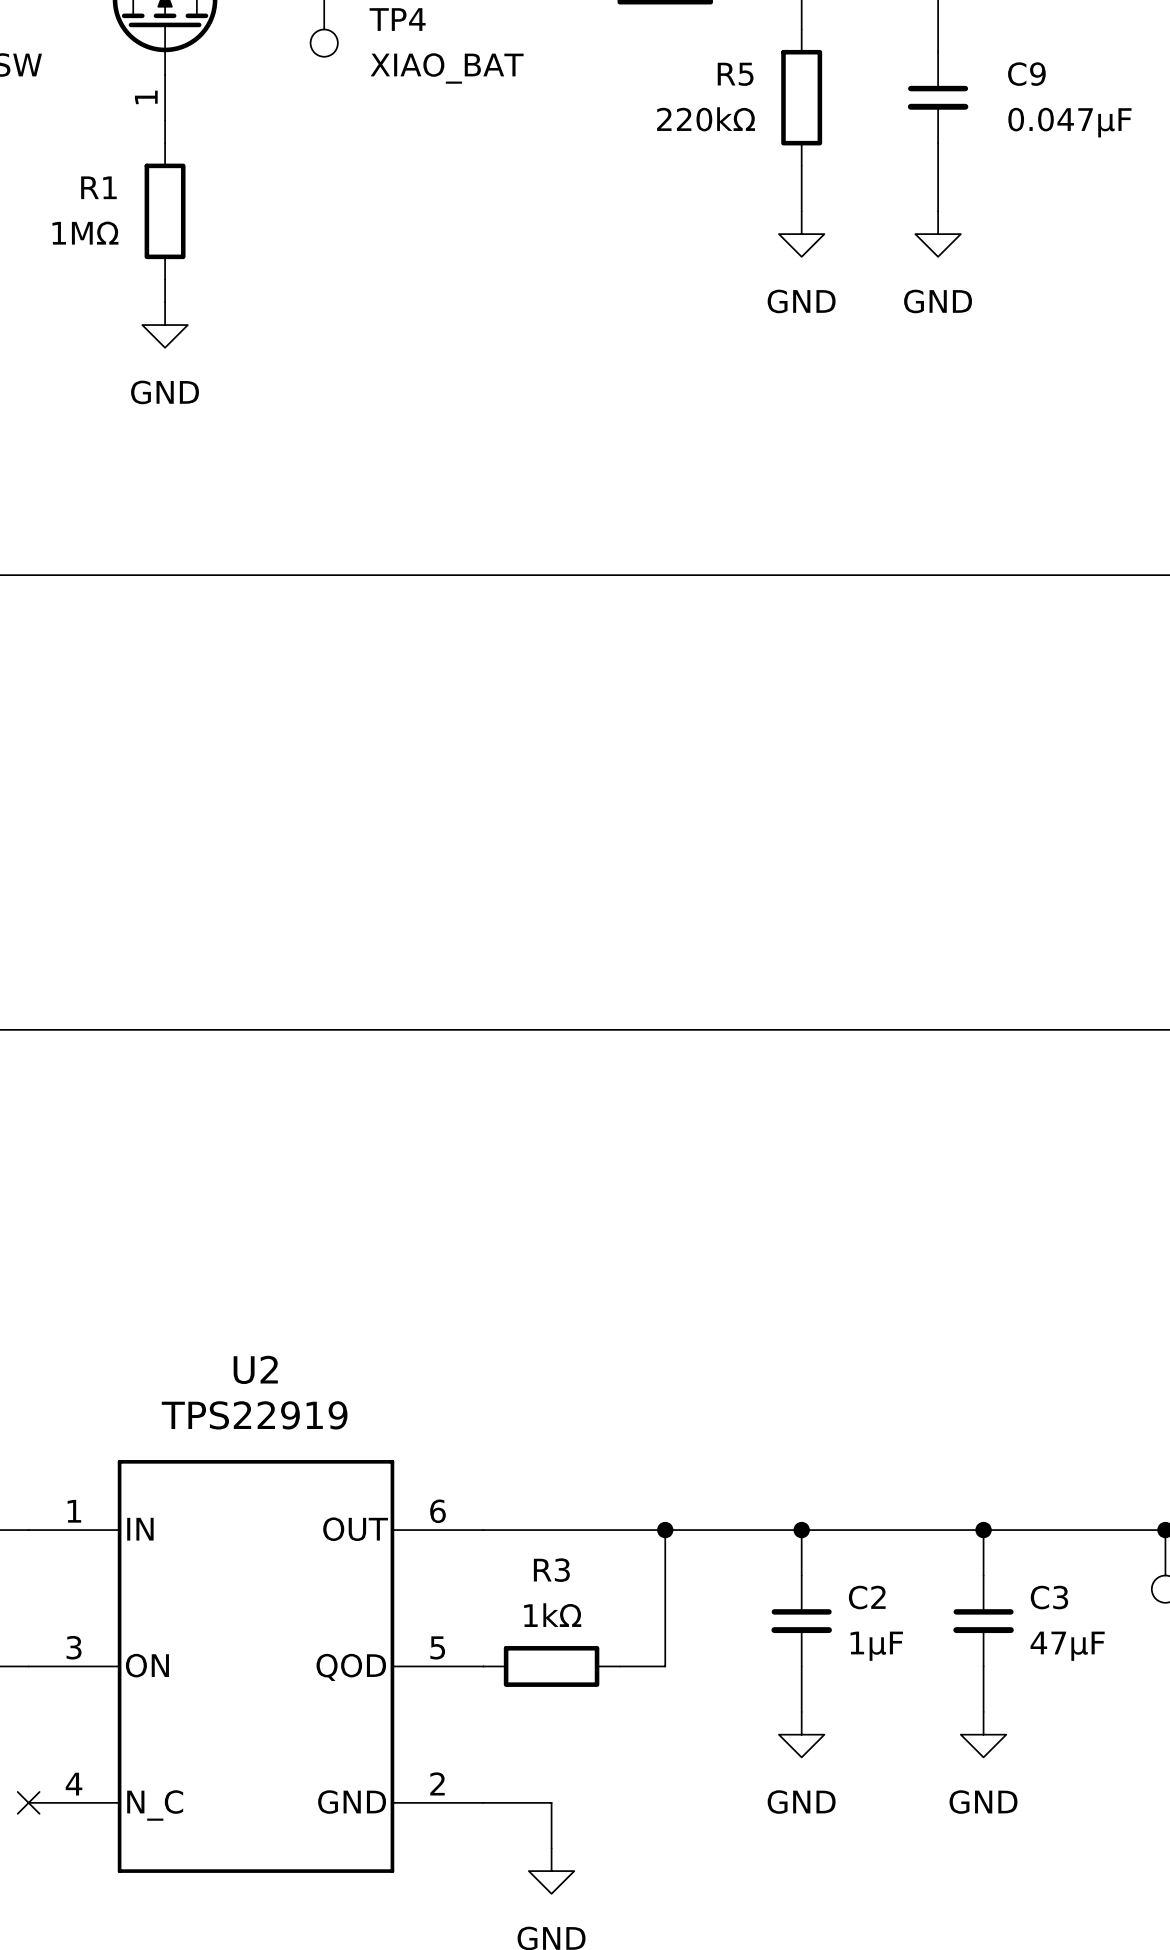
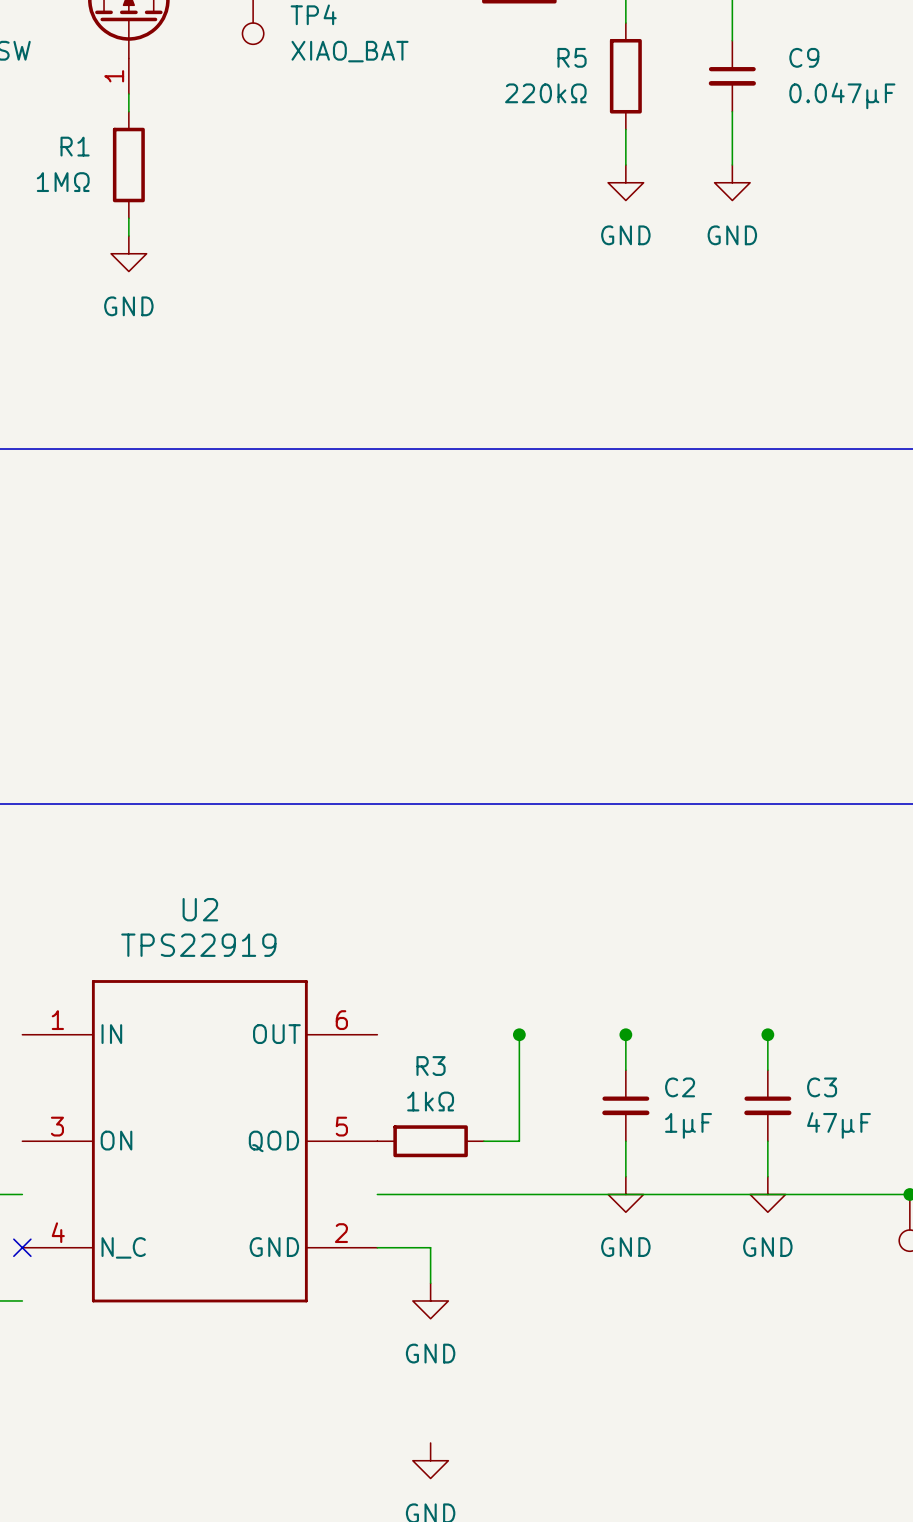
junction: none -> (519, 1034)
junction: none -> (625, 1034)
junction: none -> (767, 1034)
wire: (665, 1530) (665, 1666) (619, 1666) -> (519, 1034) (519, 1141) (483, 1141)
junction: (665, 1530) -> none
wire: (801, 1530) (801, 1575) -> (625, 1034) (625, 1070)
junction: (801, 1530) -> none
power symbol: none -> GND (625, 1194)
wire: (983, 1530) (983, 1575) -> (767, 1034) (767, 1070)
junction: (983, 1530) -> none
power symbol: none -> GND (767, 1194)
no-connect mark: none -> (22, 1247)
C2 position: (801, 1620) -> (625, 1105)
C3 position: (983, 1620) -> (767, 1105)
U2 position: (256, 1666) -> (199, 1141)
power symbol: none -> GND (430, 1300)
R3 position: (551, 1666) -> (430, 1141)
wire: (801, 1666) (801, 1711) -> (625, 1141) (625, 1176)
wire: (983, 1666) (983, 1711) -> (767, 1141) (767, 1176)
power symbol: GND (801, 1734) -> none
power symbol: GND (983, 1734) -> none
no-connect mark: (28, 1802) -> none
wire: (483, 1802) (551, 1802) (551, 1848) -> (377, 1247) (430, 1247) (430, 1283)

